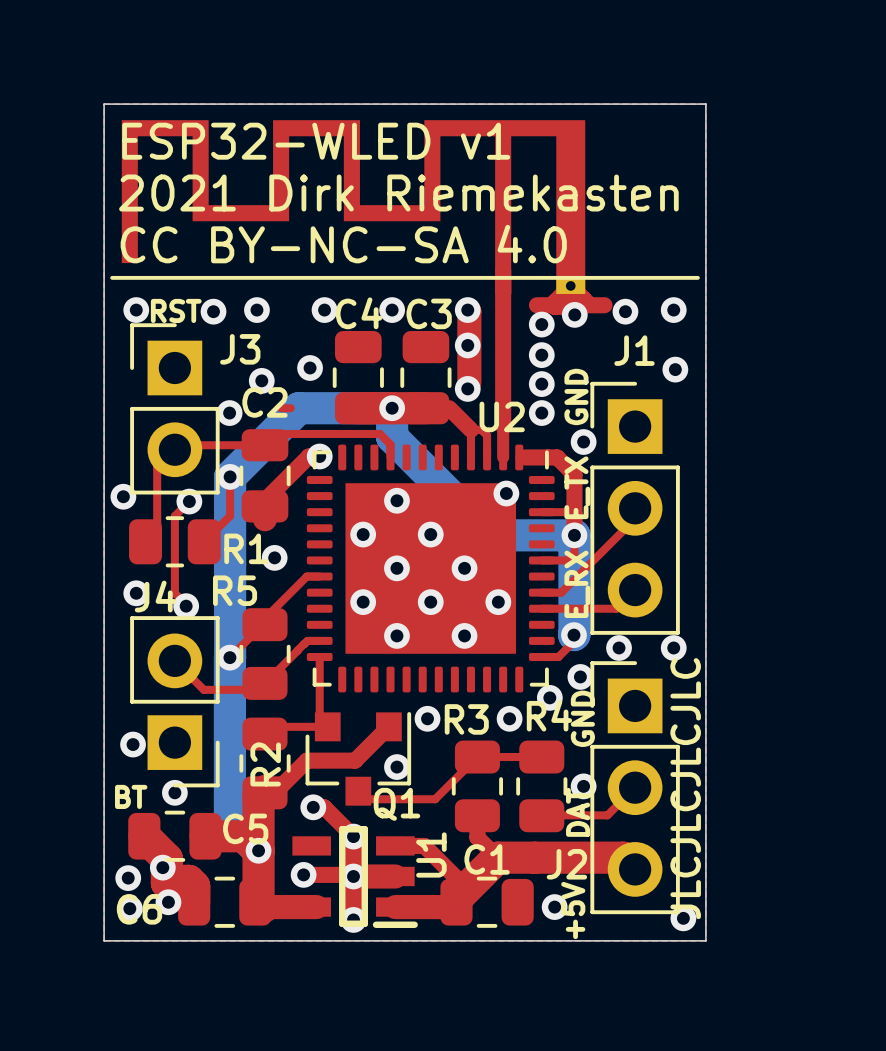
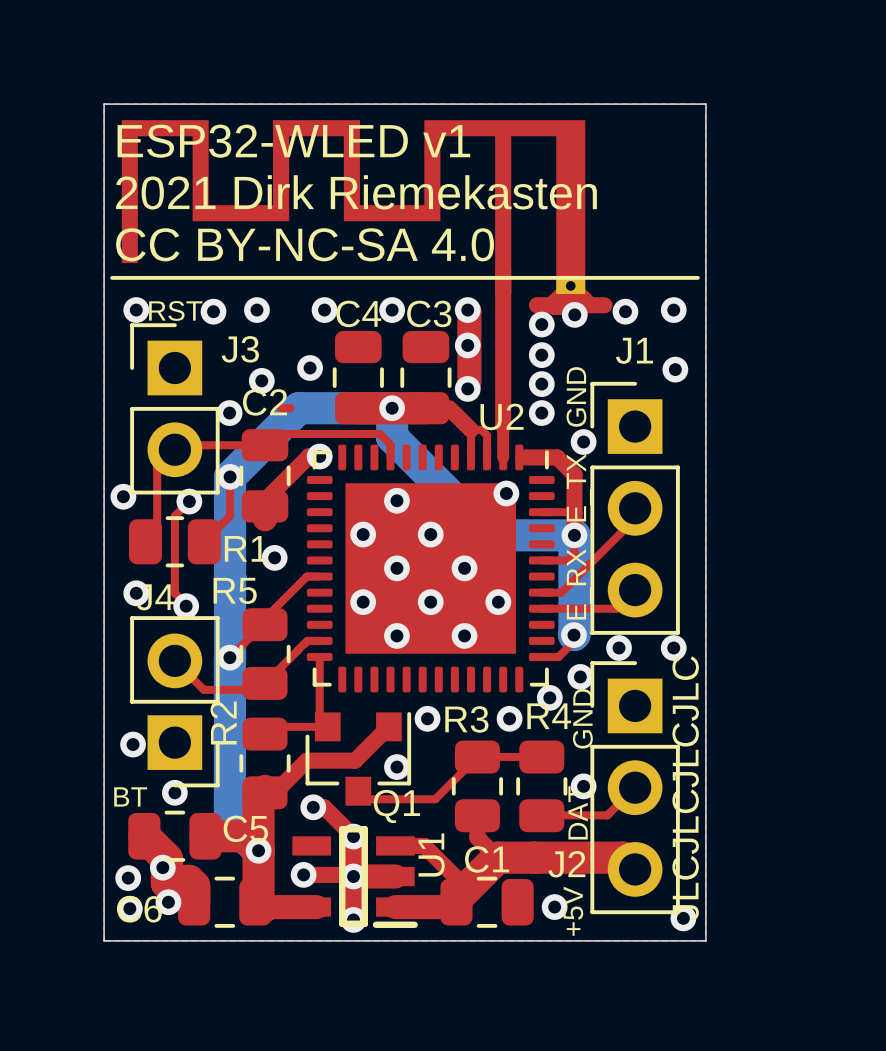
R2 name position: R2 (265, 764) -> R2 (223, 723)

